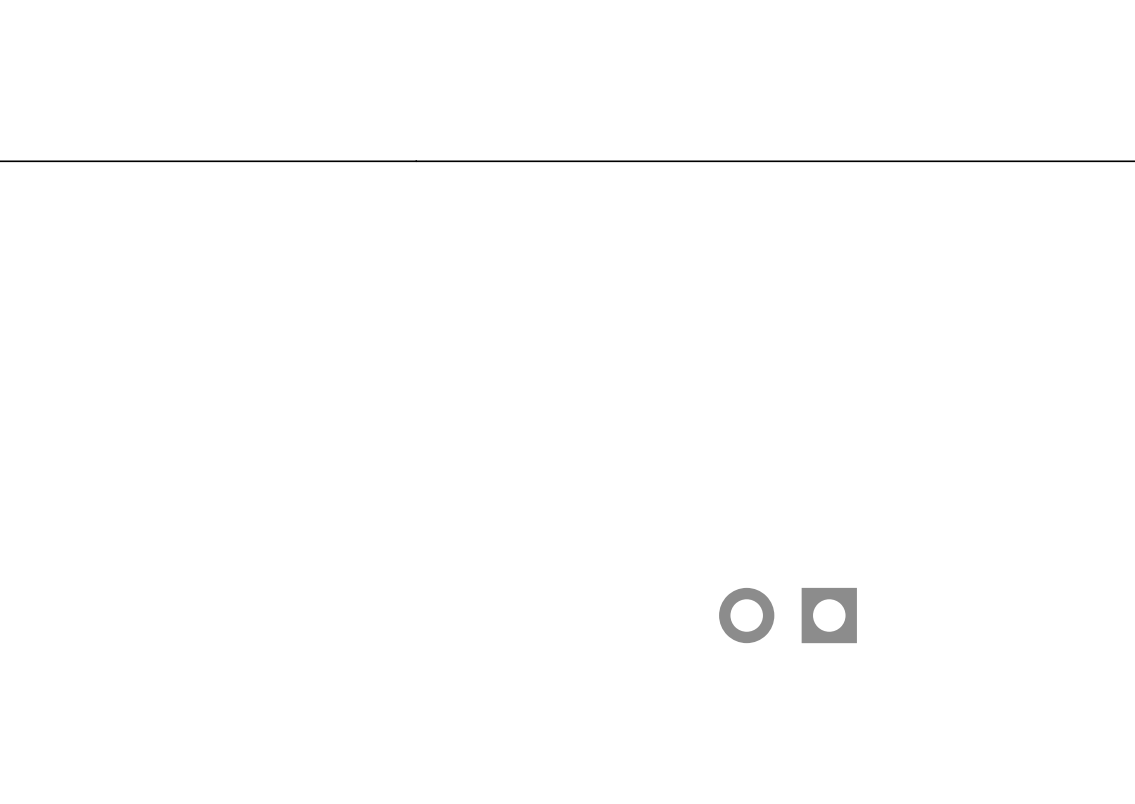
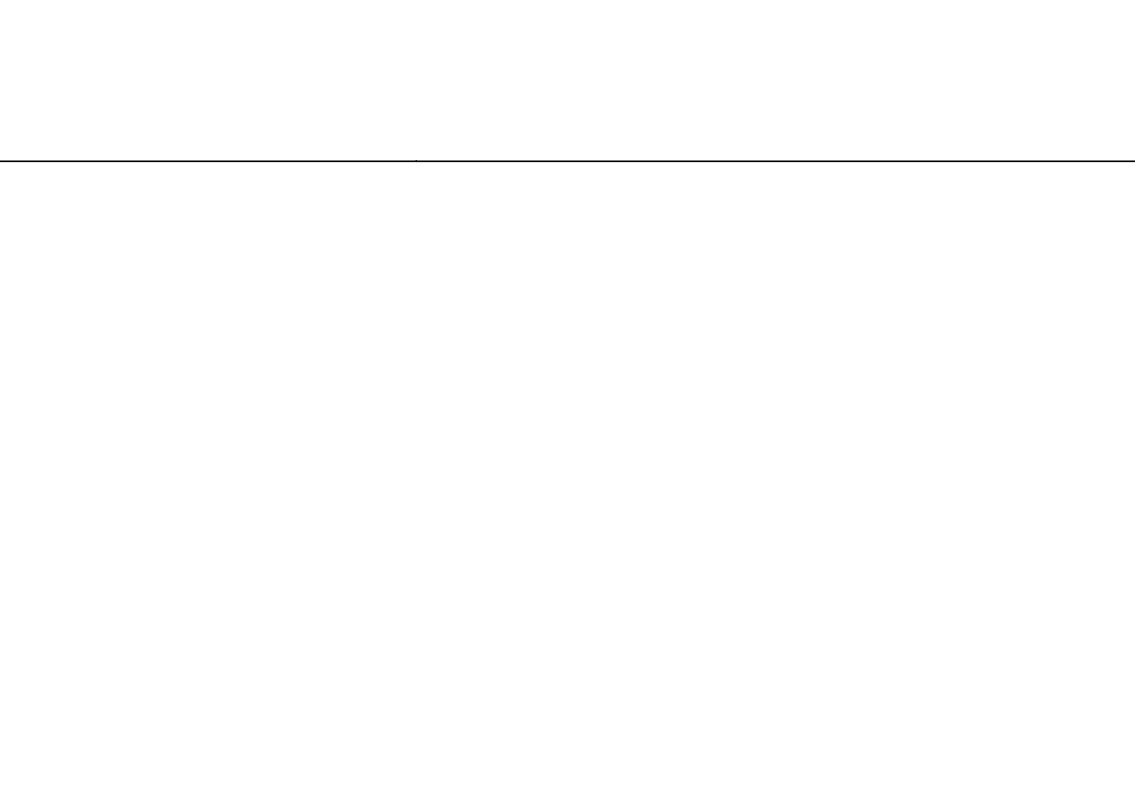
part: (787, 615) -> none

